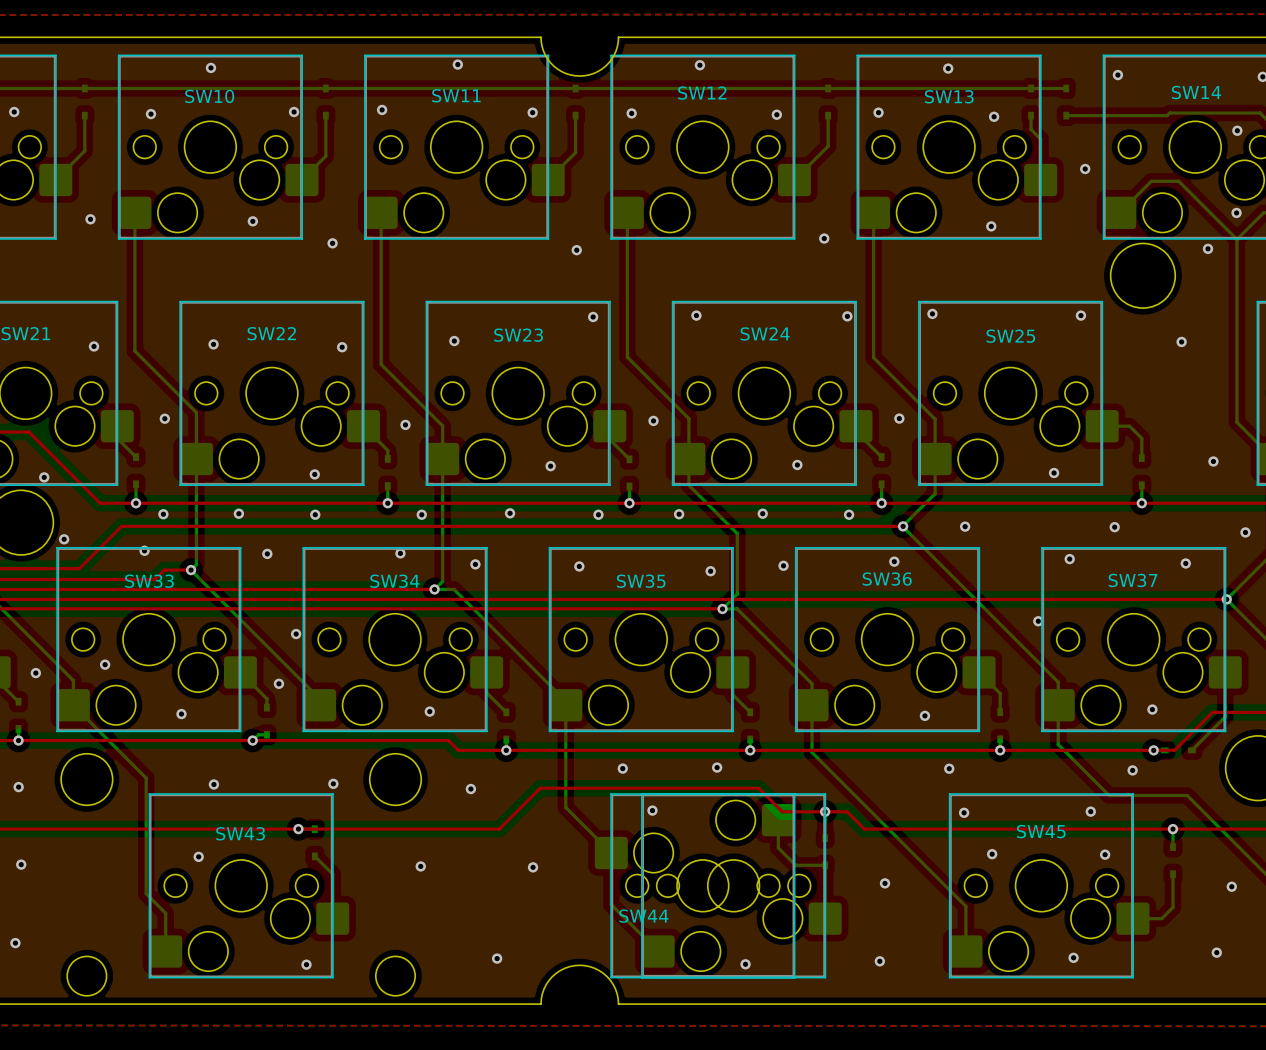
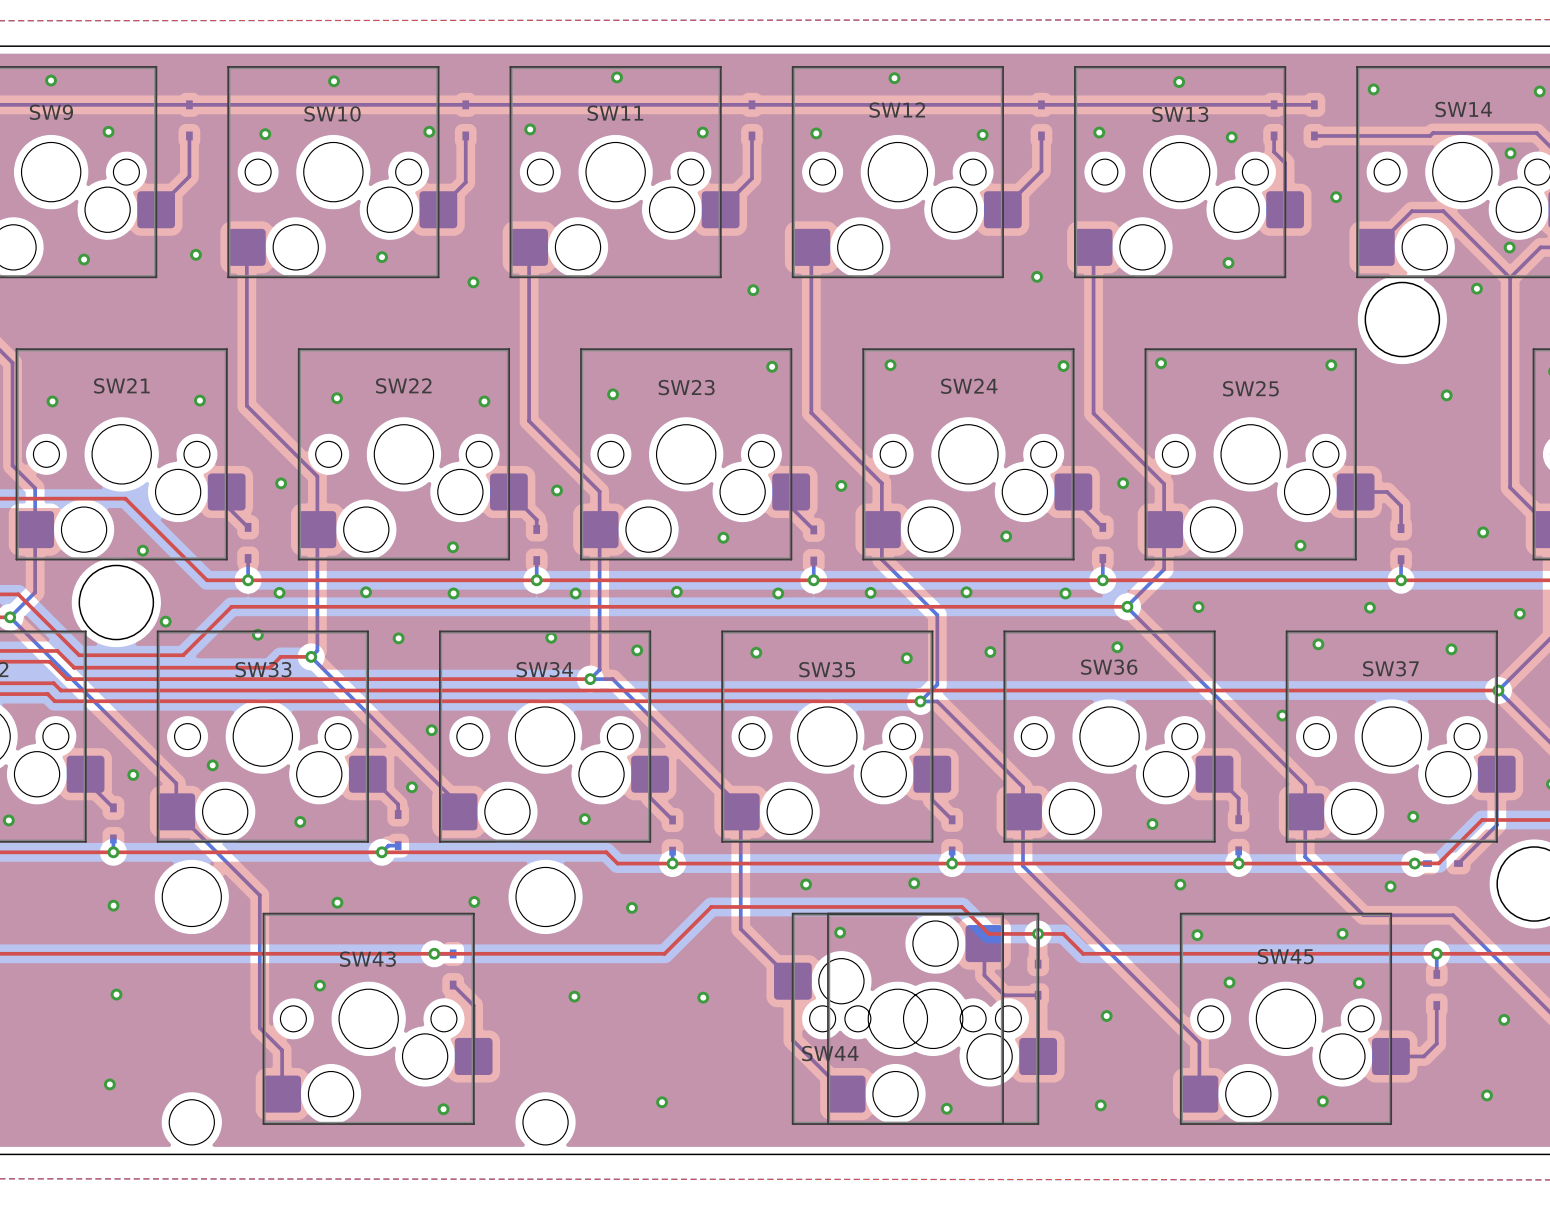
board edge: (540, 37) (545, 55) (554, 66) (566, 73) (579, 76) (593, 73) (605, 66) (614, 55) (618, 37) -> (712, 46) (801, 46)
board edge: (540, 1004) (543, 989) (552, 976) (564, 968) (579, 965) (594, 968) (607, 976) (615, 989) (618, 1004) -> (712, 1154) (801, 1154)

